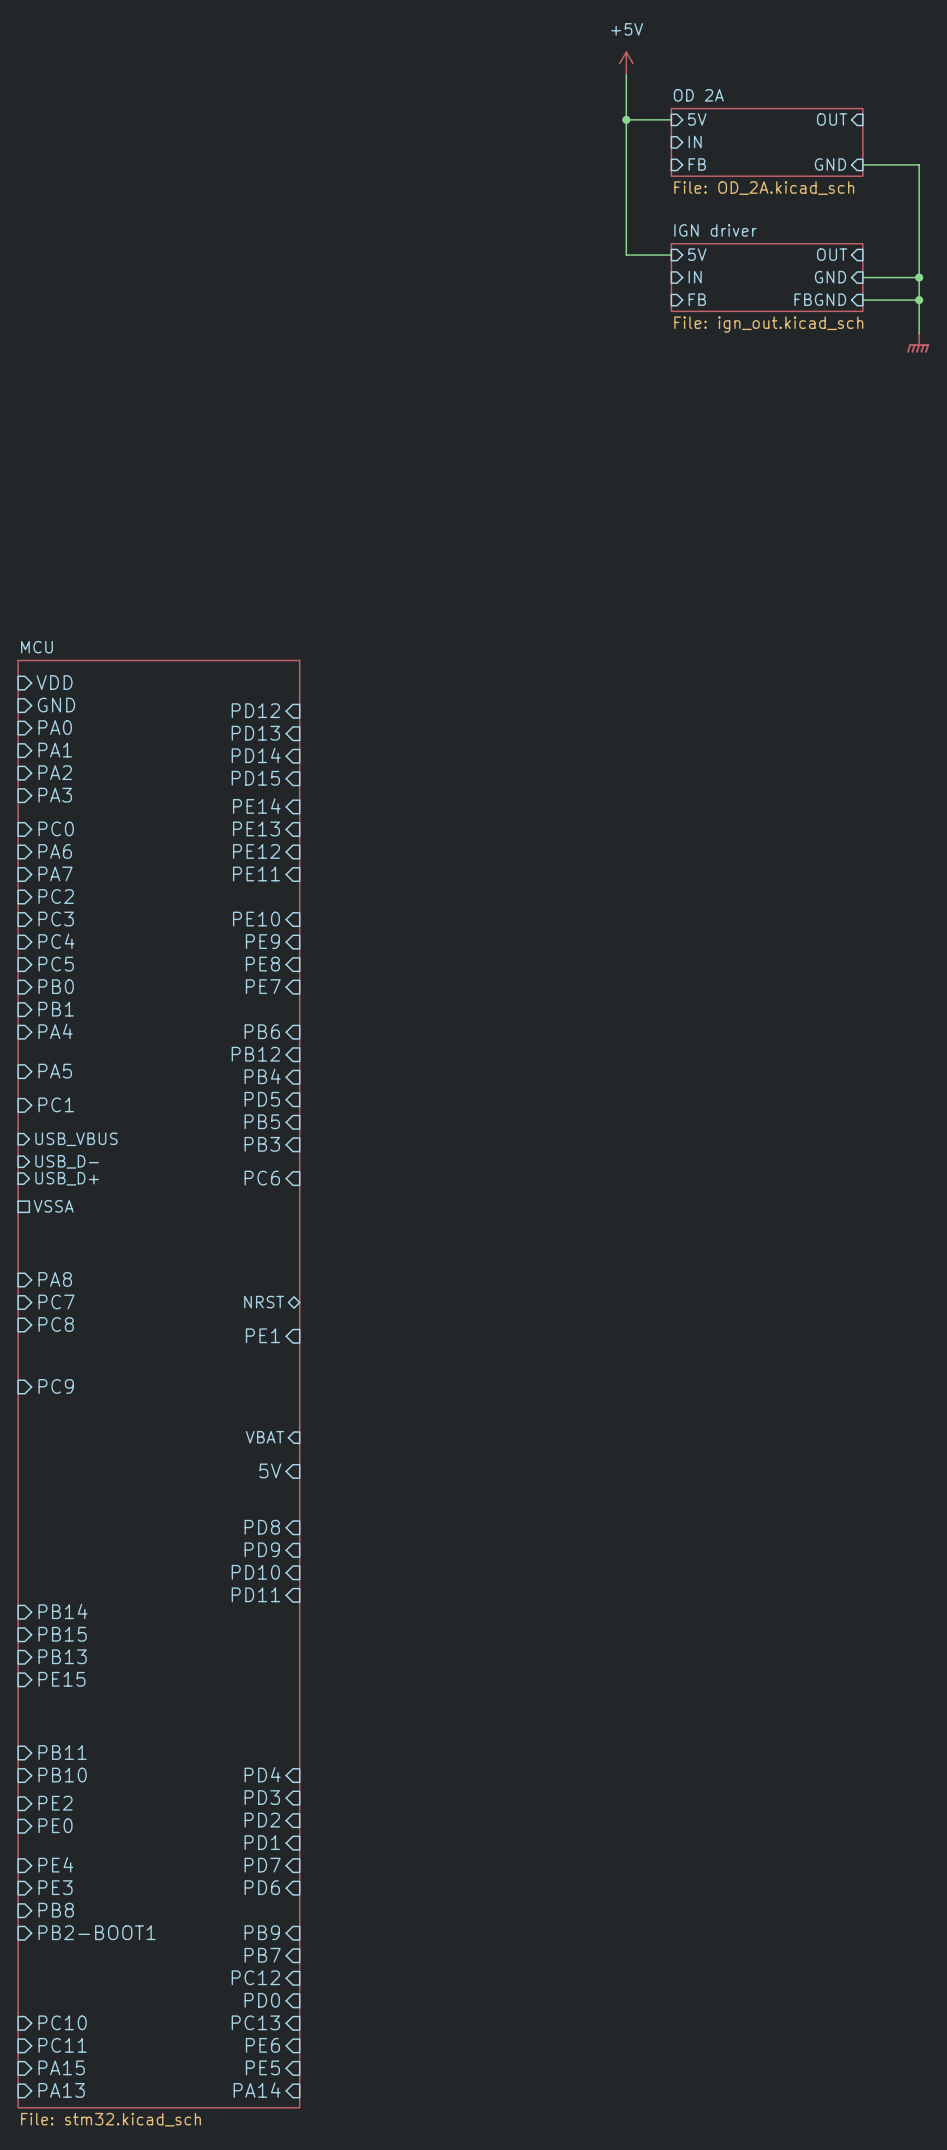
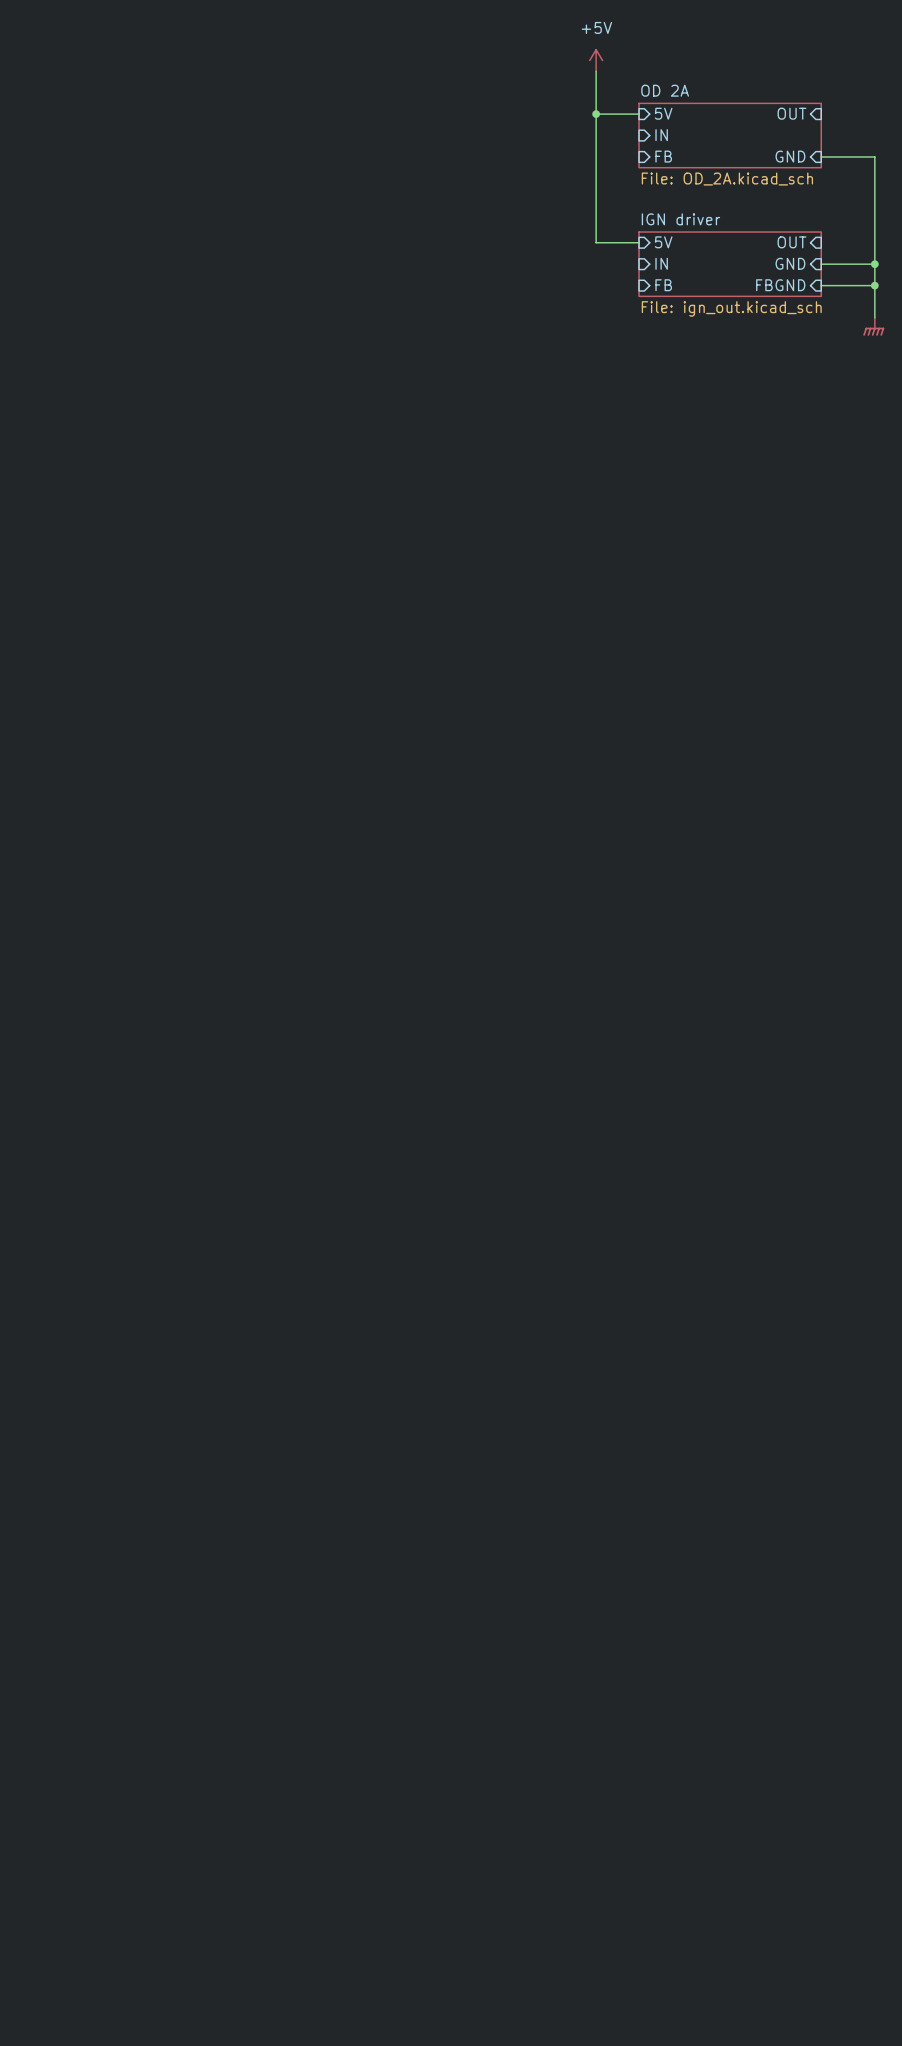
sheet pin: VDD (54, 682) -> none
sheet pin: GND (56, 705) -> none
sheet pin: PD12 (255, 710) -> none
sheet pin: PA0 (55, 727) -> none
sheet pin: PD13 (255, 733) -> none
sheet pin: PA1 (55, 750) -> none
sheet pin: PD14 (256, 755) -> none
sheet pin: PA2 (55, 772) -> none
sheet pin: PD15 (255, 778) -> none
sheet pin: PA3 (55, 795) -> none
sheet pin: PE14 (256, 806) -> none
sheet pin: PC0 (56, 828) -> none
sheet pin: PE13 (256, 828) -> none
sheet pin: PA6 (55, 851) -> none
sheet pin: PE12 (256, 851) -> none
sheet pin: PA7 (55, 874) -> none
sheet pin: PE11 (256, 874) -> none
sheet pin: PC2 (56, 896) -> none
sheet pin: PC3 (56, 919) -> none
sheet pin: PE10 (256, 919) -> none
sheet pin: PC4 (56, 941) -> none
sheet pin: PE9 (262, 941) -> none
sheet pin: PC5 (56, 964) -> none
sheet pin: PE8 (262, 964) -> none
sheet pin: PB0 (56, 986) -> none
sheet pin: PE7 (263, 986) -> none
sheet pin: PB1 (56, 1009) -> none
sheet pin: PA4 (55, 1031) -> none
sheet pin: PB6 (262, 1031) -> none
sheet pin: PB12 (255, 1054) -> none
sheet pin: PA5 (55, 1071) -> none
sheet pin: PB4 (262, 1076) -> none
sheet pin: PD5 (262, 1099) -> none
sheet pin: PC1 (56, 1104) -> none
sheet pin: PB5 (262, 1121) -> none
sheet pin: USB_VBUS (76, 1139) -> none
sheet pin: PB3 (262, 1144) -> none
sheet pin: USB_D- (67, 1161) -> none
sheet pin: USB_D+ (67, 1178) -> none
sheet pin: PC6 (262, 1178) -> none
sheet pin: VSSA (53, 1206) -> none
sheet pin: PA8 (55, 1279) -> none
sheet pin: PC7 (56, 1301) -> none
sheet pin: NRST (264, 1302) -> none
sheet pin: PC8 (56, 1324) -> none
sheet pin: PE1 (262, 1335) -> none
sheet MCU: File: stm32.kicad_sch (158, 1384) -> none
sheet pin: PC9 (56, 1386) -> none
sheet pin: VBAT (264, 1437) -> none
sheet pin: 5V (270, 1470) -> none
sheet pin: PD8 (262, 1527) -> none
sheet pin: PD9 (262, 1549) -> none
sheet pin: PD10 (255, 1572) -> none
sheet pin: PD11 (255, 1594) -> none
sheet pin: PB14 (62, 1611) -> none
sheet pin: PB15 (62, 1634) -> none
sheet pin: PB13 (62, 1656) -> none
sheet pin: PE15 (61, 1679) -> none
sheet pin: PB11 (62, 1752) -> none
sheet pin: PD4 (262, 1774) -> none
sheet pin: PB10 (62, 1775) -> none
sheet pin: PD3 (262, 1797) -> none
sheet pin: PE2 (55, 1803) -> none
sheet pin: PD2 (262, 1820) -> none
sheet pin: PE0 (55, 1825) -> none
sheet pin: PD1 (262, 1842) -> none
sheet pin: PE4 (55, 1864) -> none
sheet pin: PD7 (262, 1865) -> none
sheet pin: PE3 (55, 1887) -> none
sheet pin: PD6 (262, 1887) -> none
sheet pin: PB8 (56, 1910) -> none
sheet pin: PB2-BOOT1 (97, 1932) -> none
sheet pin: PB9 (262, 1932) -> none
sheet pin: PB7 (262, 1955) -> none
sheet pin: PC12 (255, 1977) -> none
sheet pin: PD0 (262, 2000) -> none
sheet pin: PC10 (62, 2022) -> none
sheet pin: PC13 (255, 2022) -> none
sheet pin: PC11 (62, 2045) -> none
sheet pin: PE6 (262, 2045) -> none
sheet pin: PA15 (61, 2067) -> none
sheet pin: PE5 (262, 2067) -> none
sheet pin: PA13 (61, 2090) -> none
sheet pin: PA14 (257, 2090) -> none

